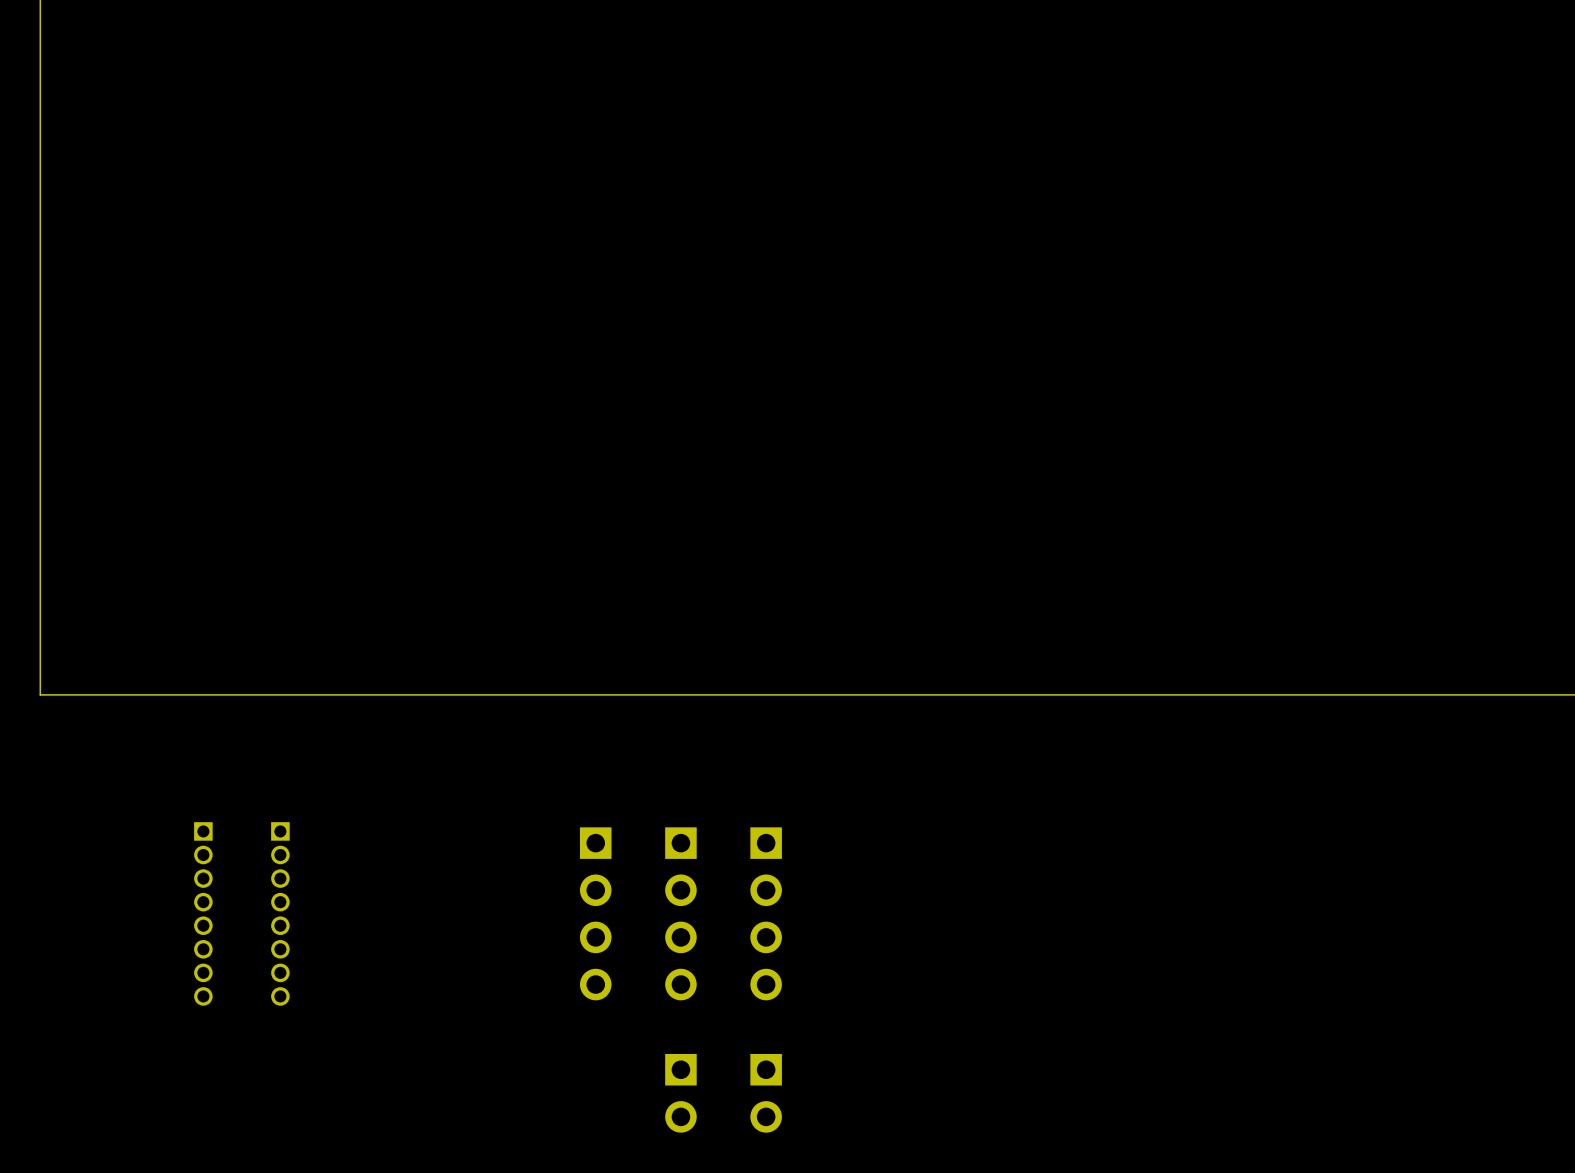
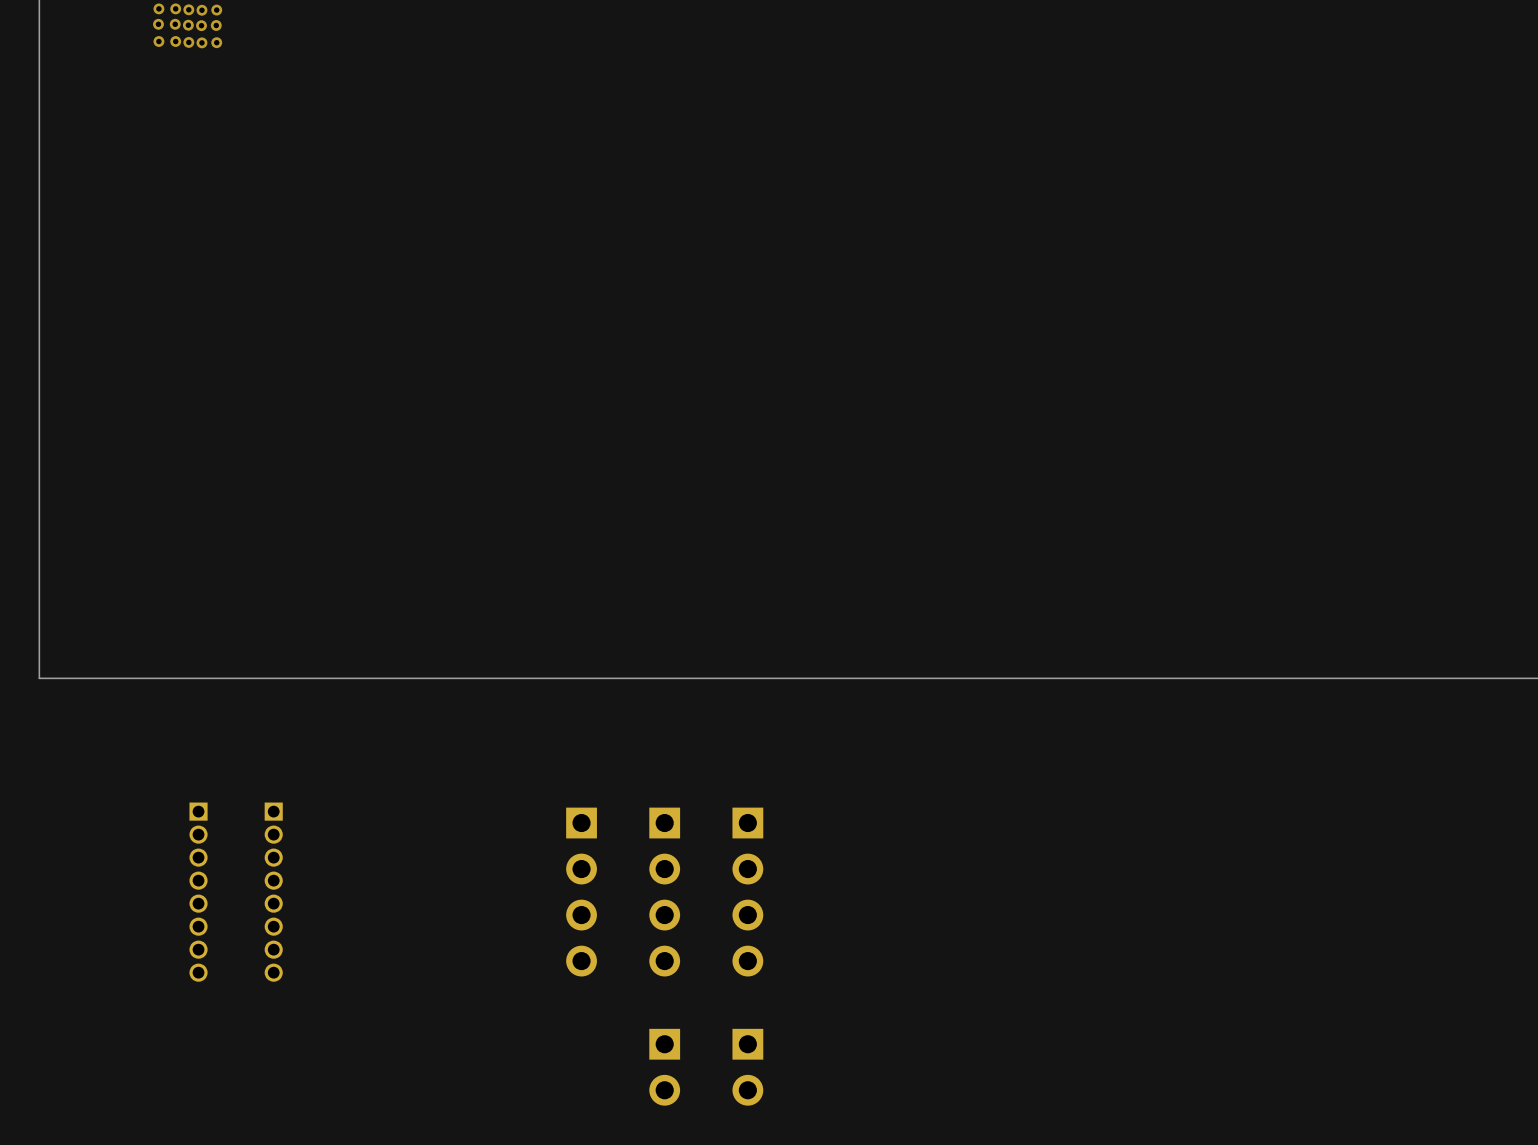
via: none -> (158, 8)
via: none -> (175, 8)
via: none -> (188, 9)
via: none -> (201, 10)
via: none -> (216, 10)
via: none -> (158, 24)
via: none -> (175, 24)
via: none -> (188, 25)
via: none -> (201, 25)
via: none -> (216, 25)
via: none -> (158, 41)
via: none -> (175, 41)
via: none -> (188, 42)
via: none -> (201, 42)
via: none -> (216, 42)

